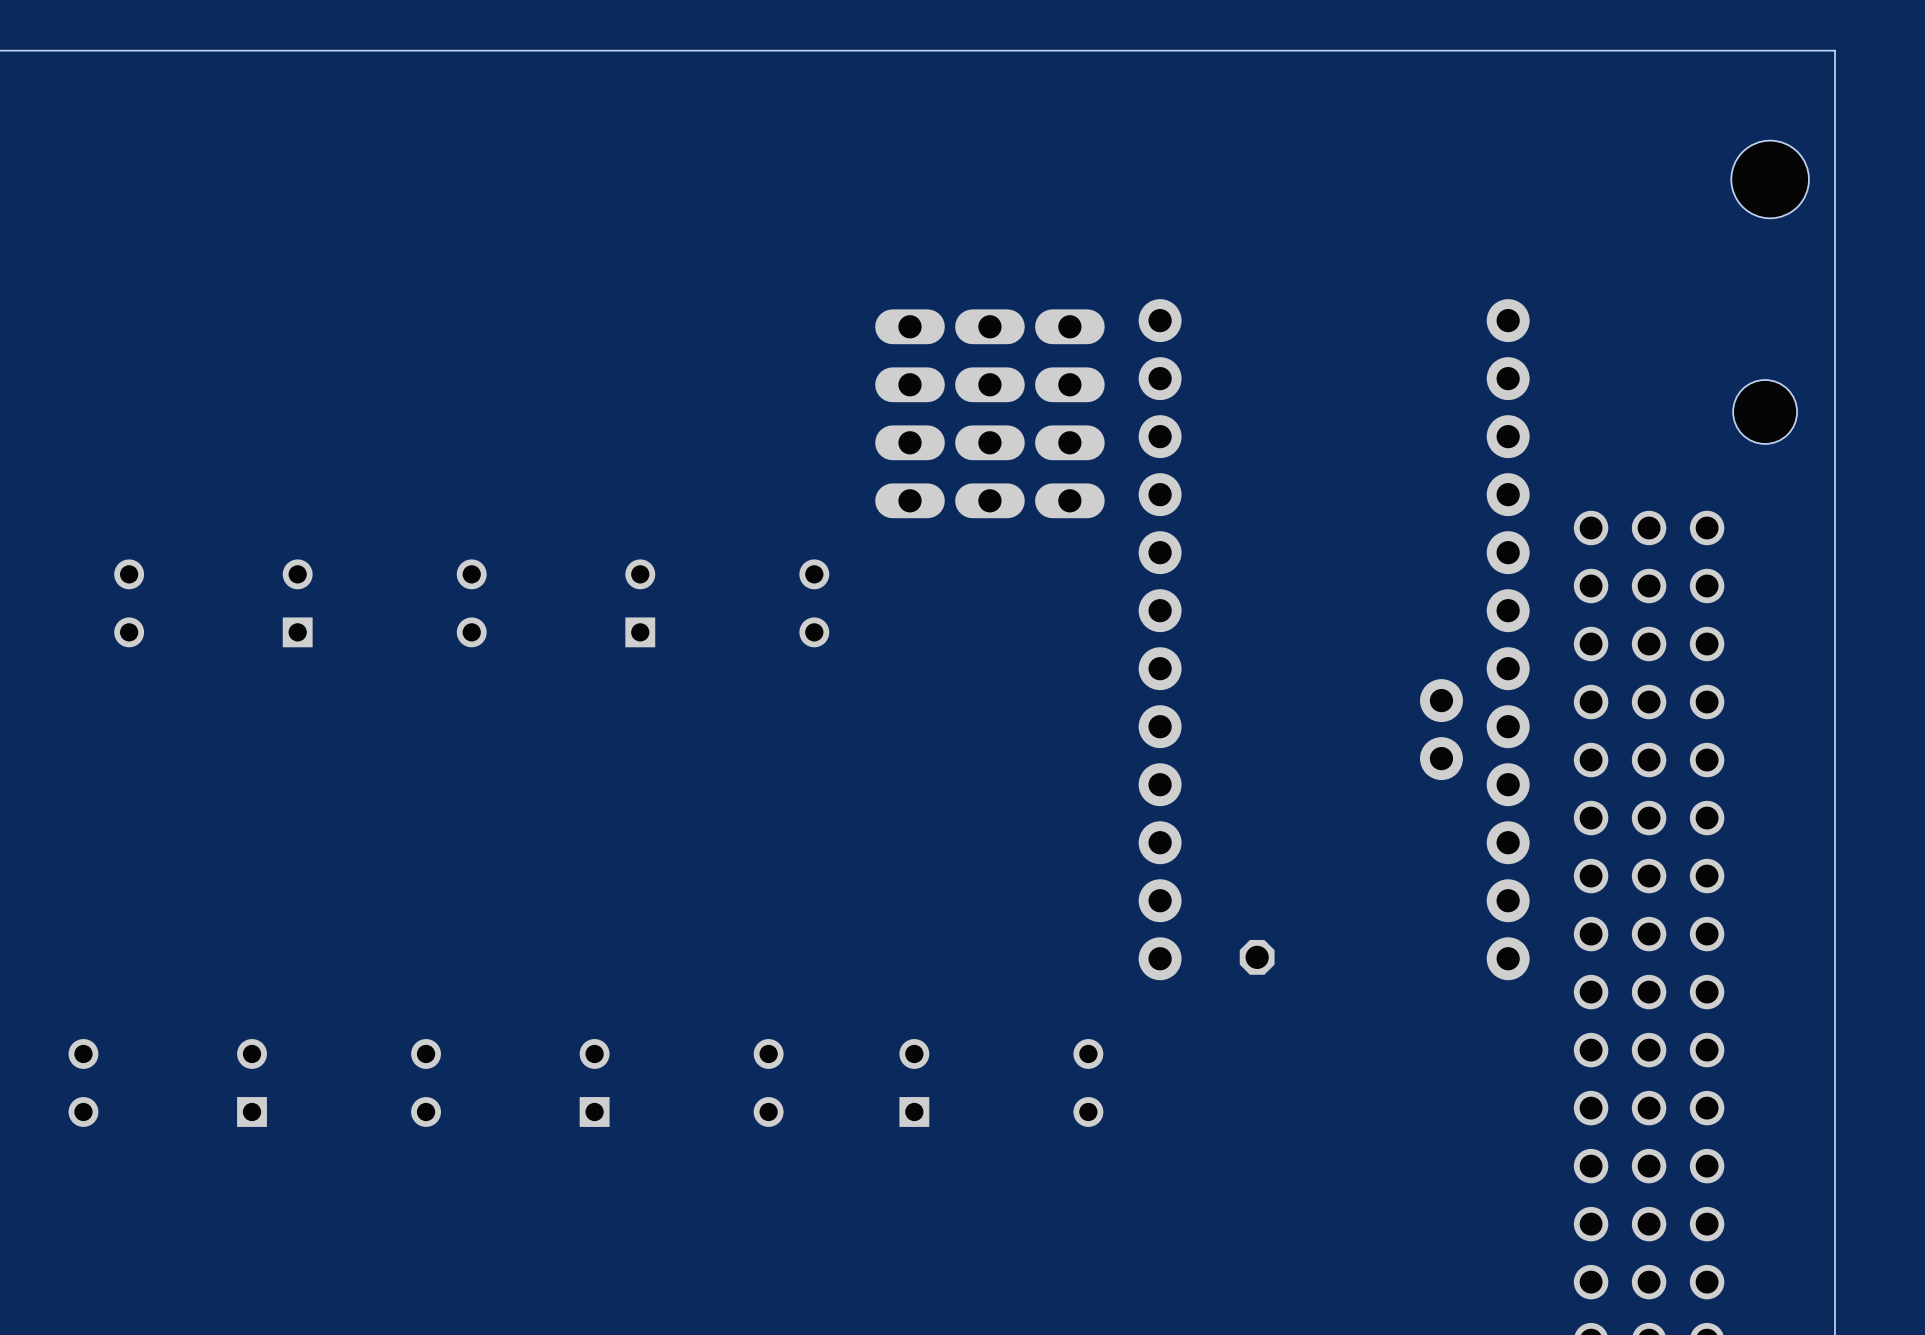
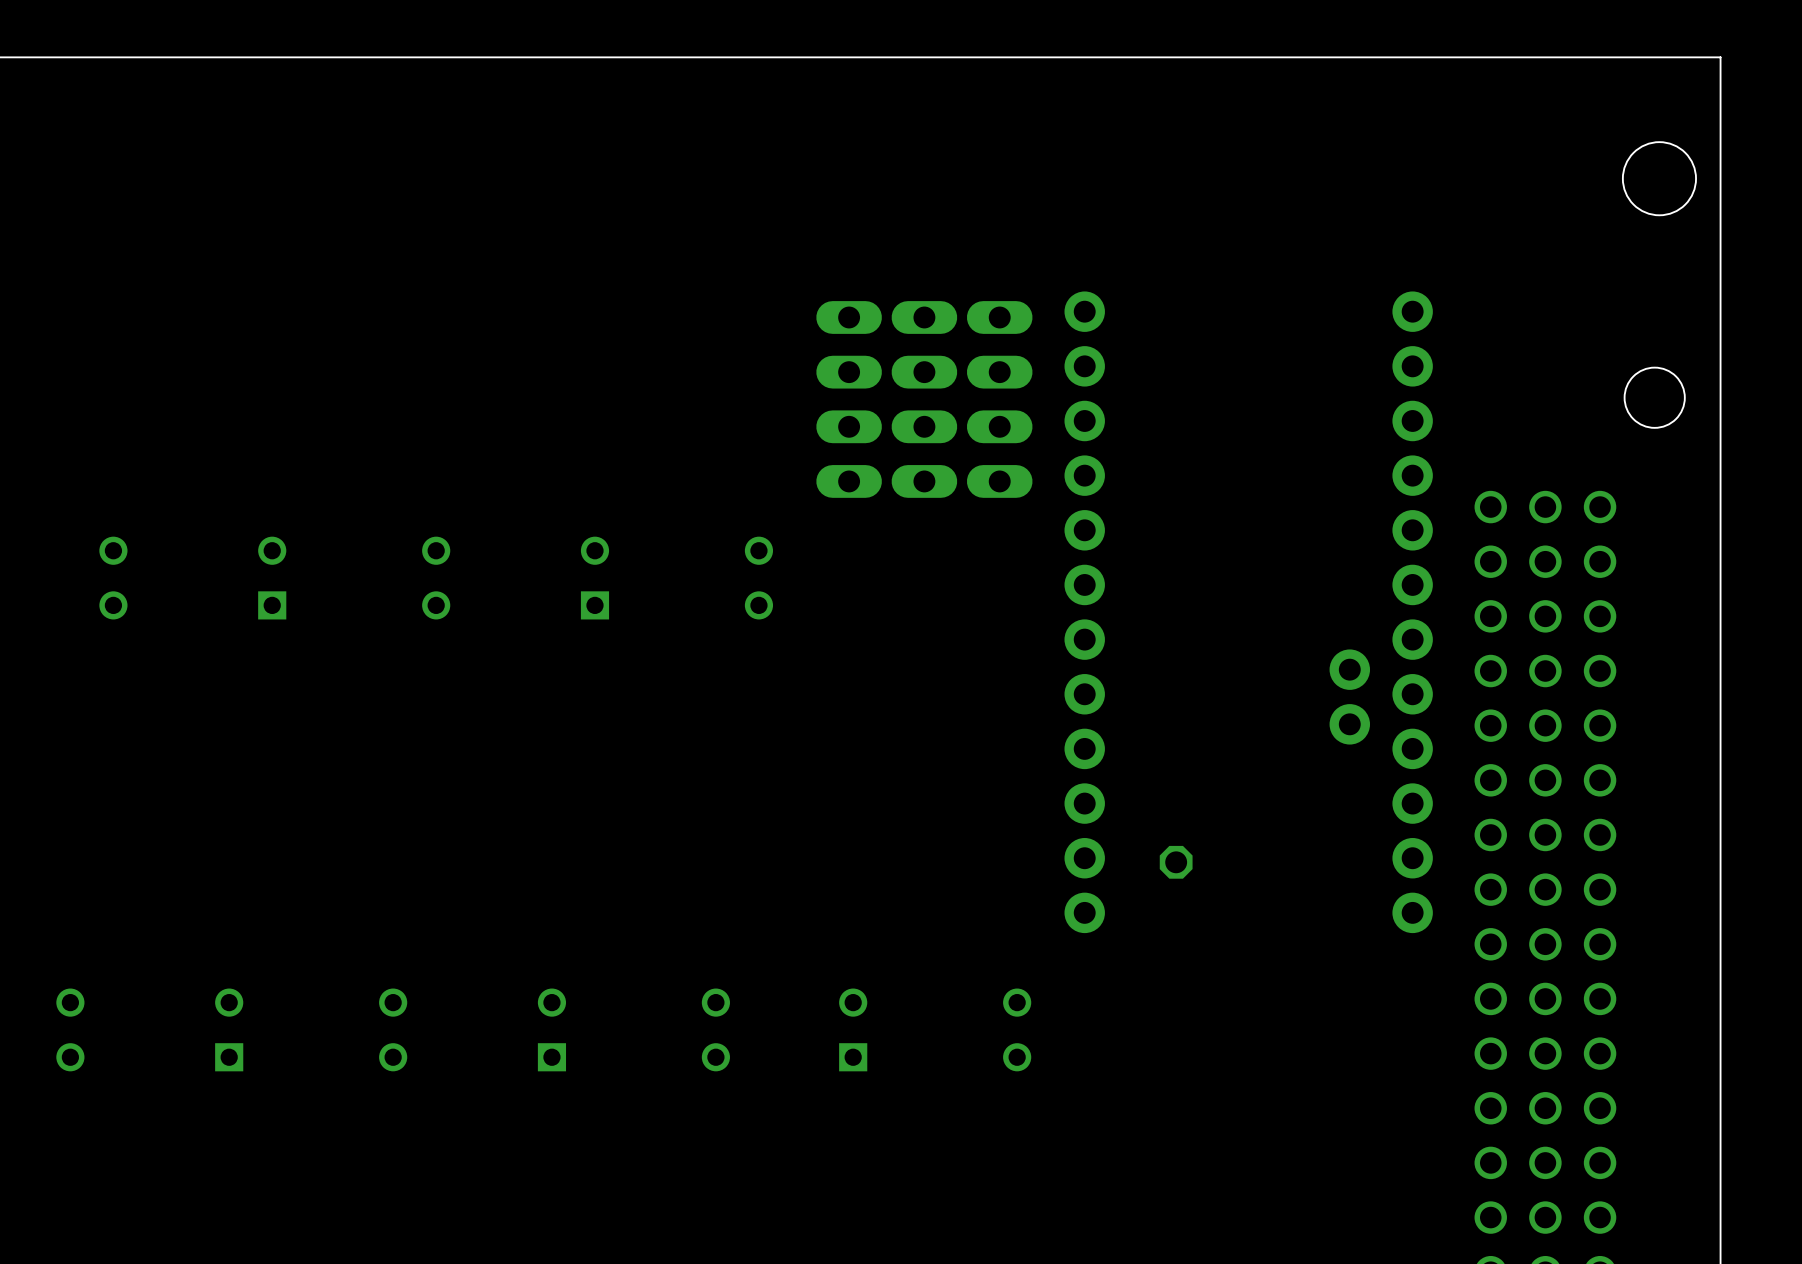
part position: (1257, 957) -> (1176, 862)

